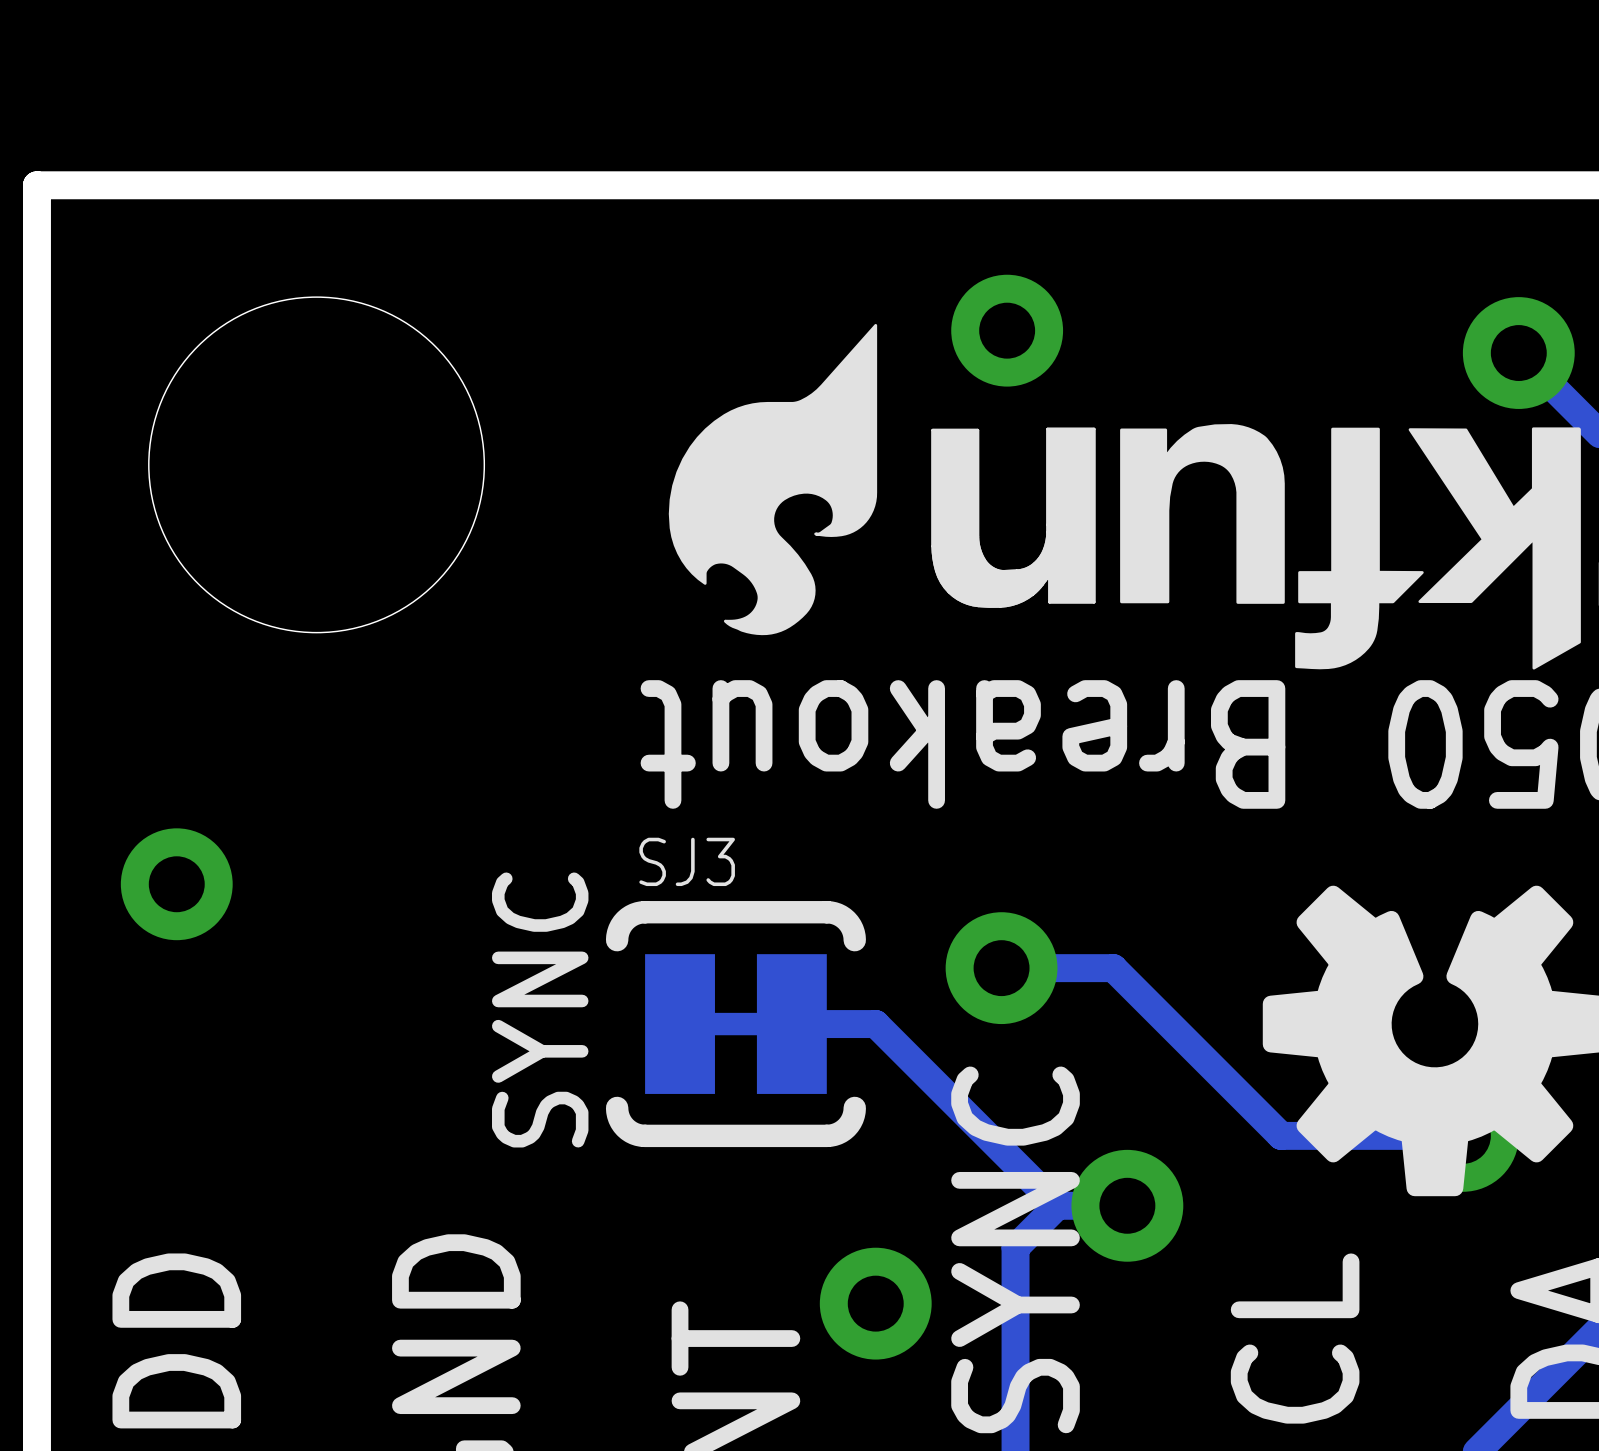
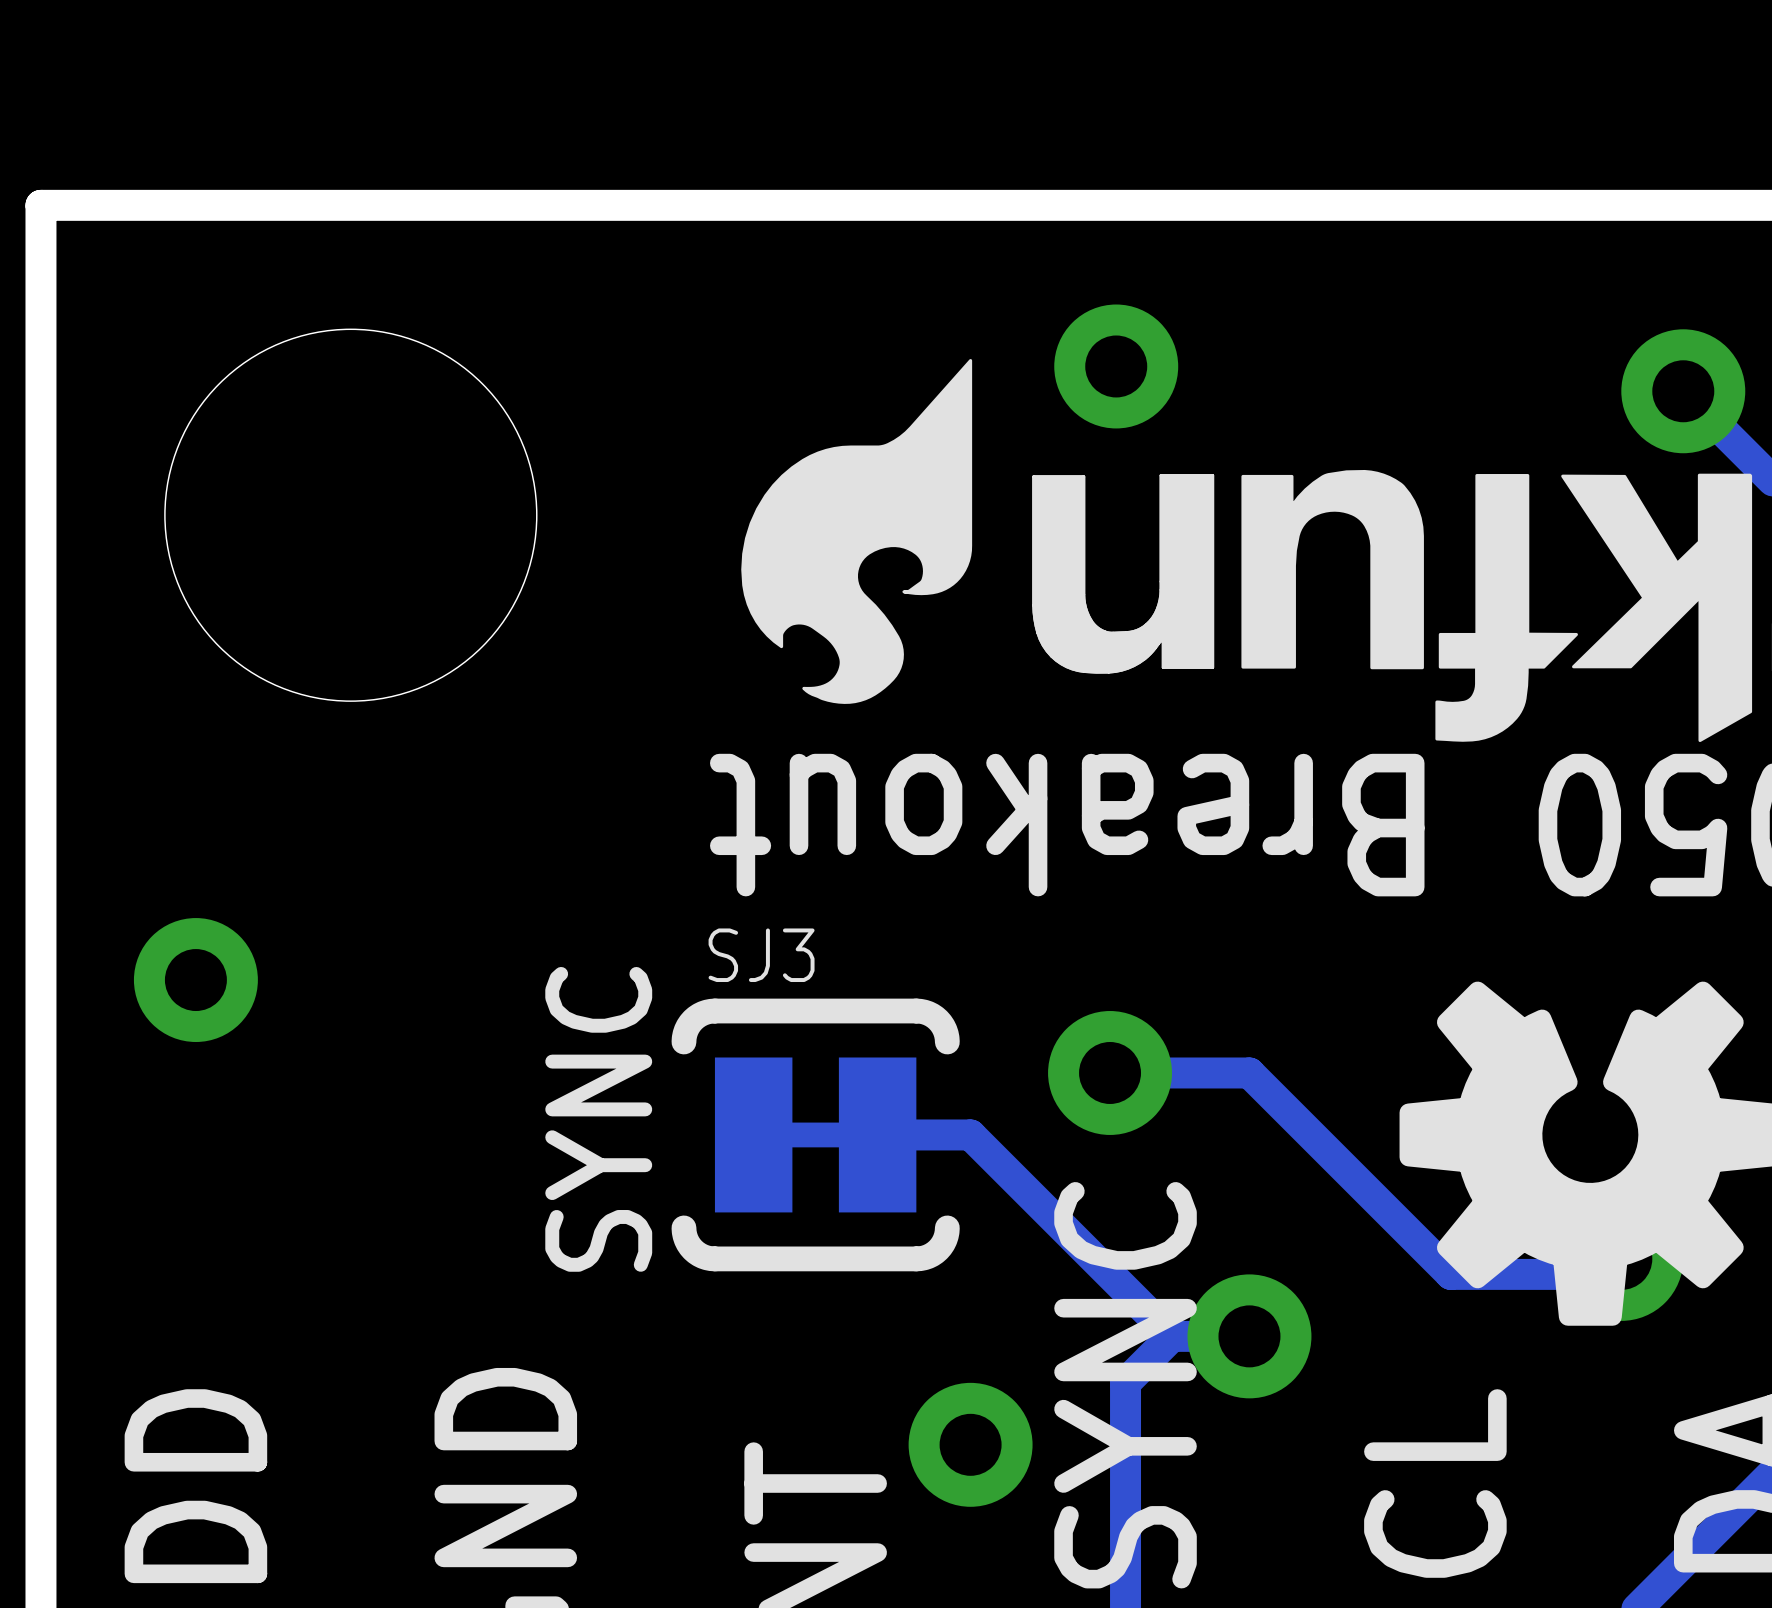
track: (1113, 968) (1281, 1135) (1462, 1135) -> (1233, 1072) (1249, 1072) (1450, 1274) (1621, 1274)

